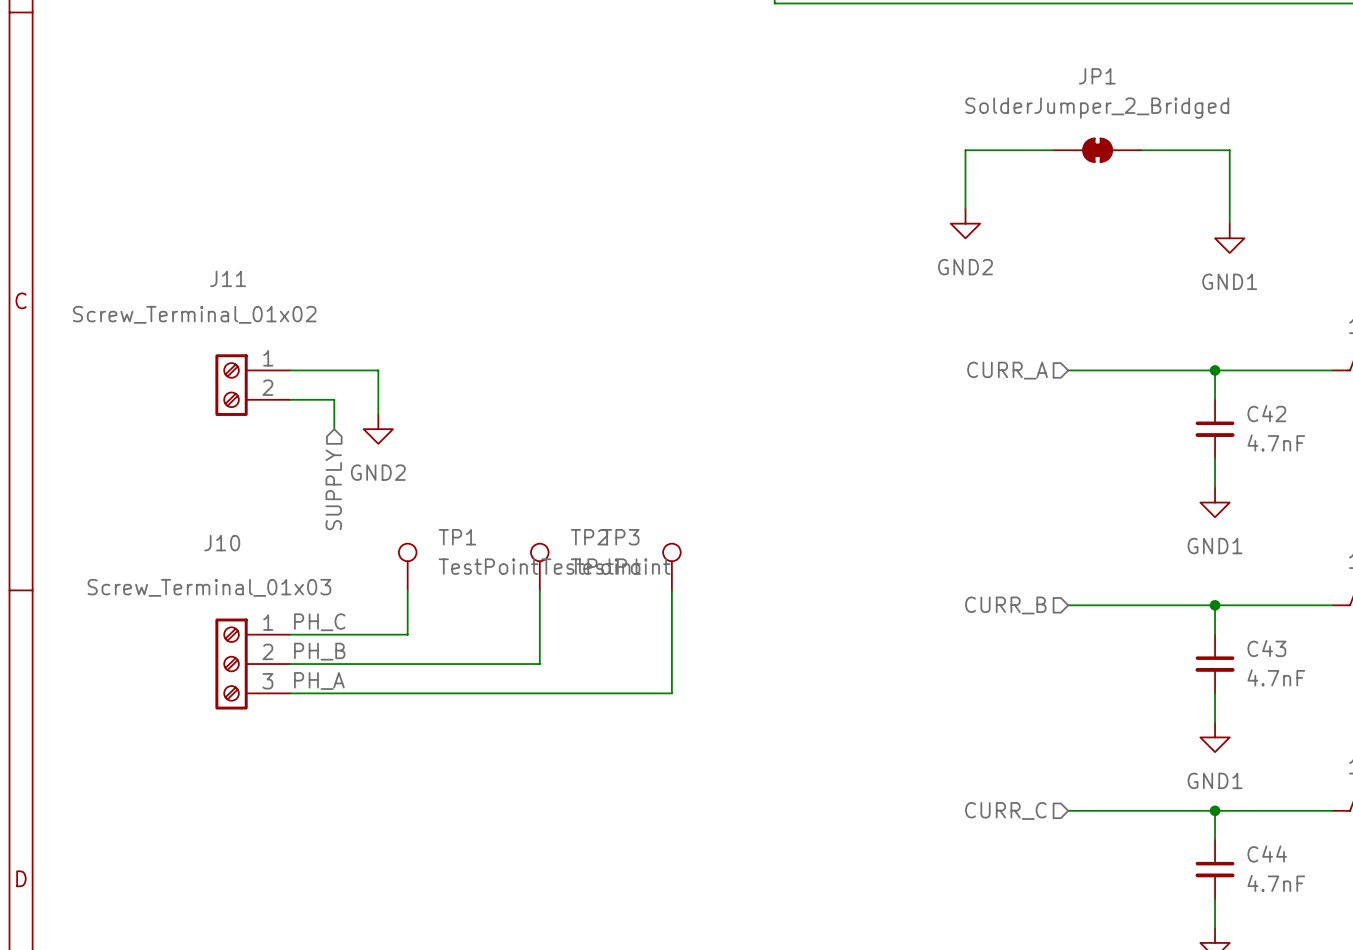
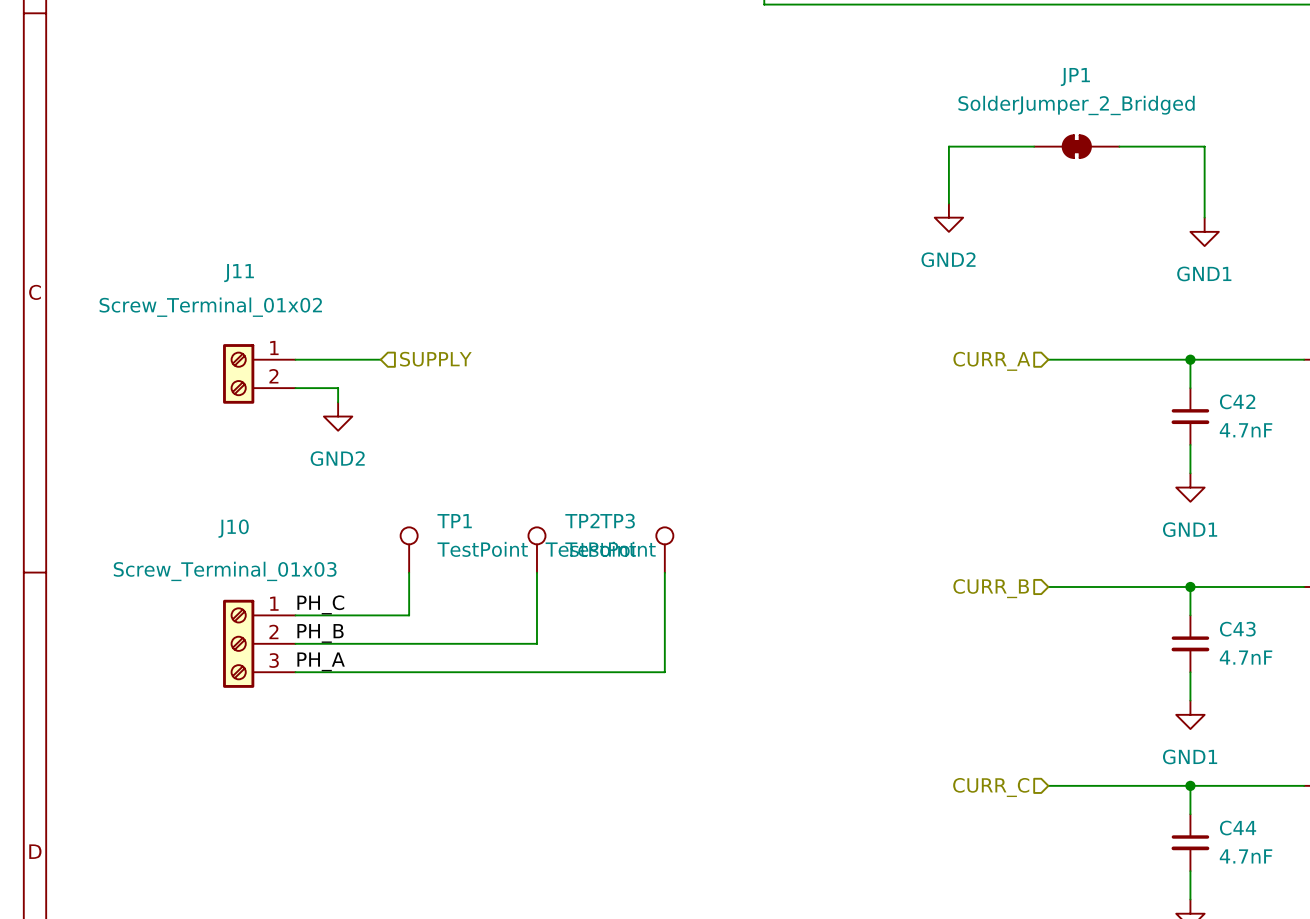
wire: (378, 370) (378, 414) -> none
power symbol position: GND2 (378, 429) -> GND2 (338, 416)
hierarchical label rotation: 0° (333, 489) -> 90° counterclockwise (435, 359)
hierarchical label position: SUPPLY (333, 489) -> SUPPLY (435, 359)

